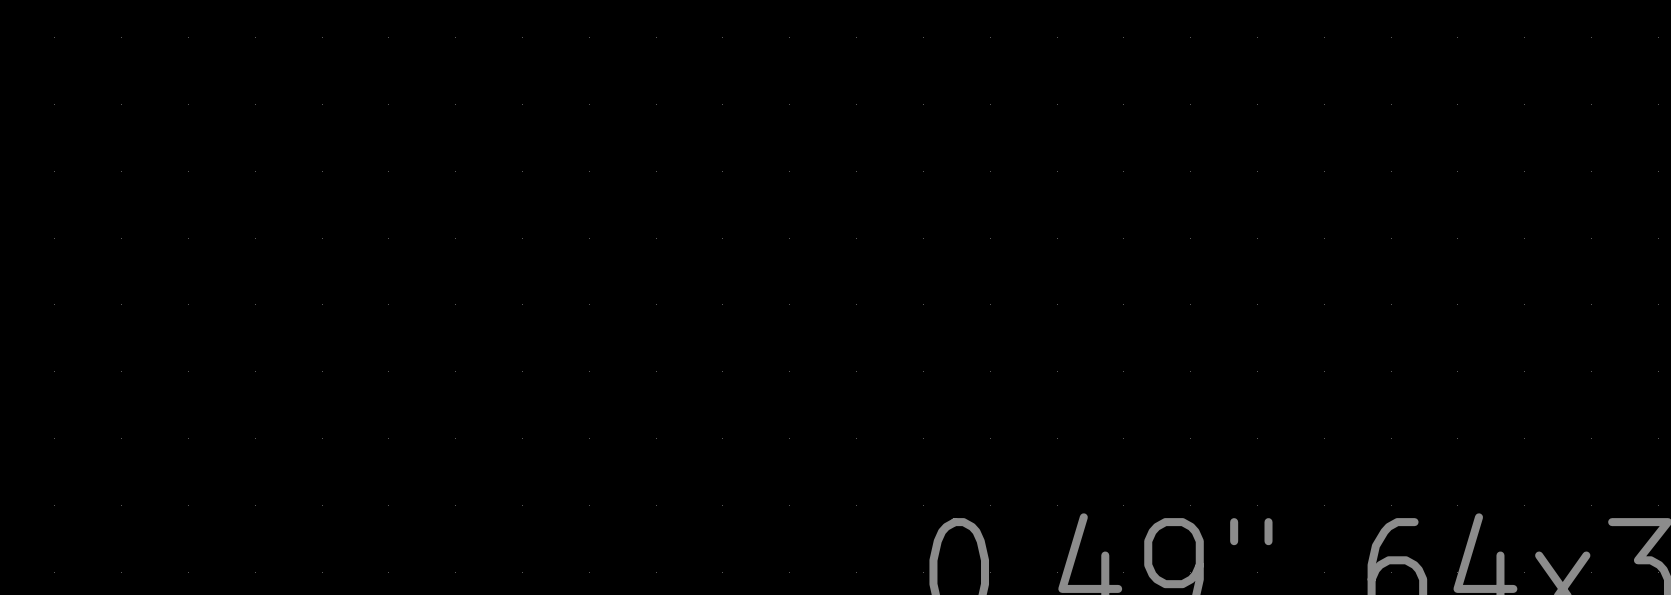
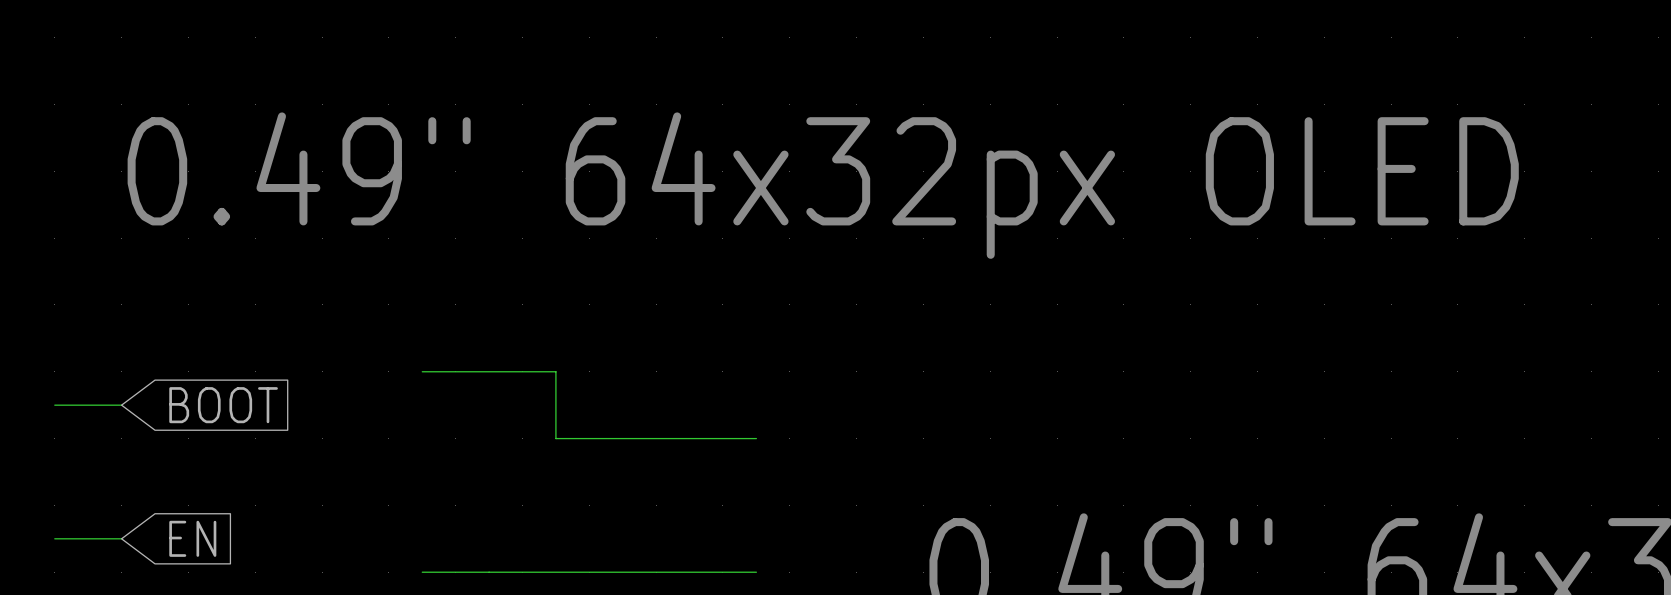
text: none -> 0.49" 64x32px OLED (823, 185)
wire: none -> (422, 371) (555, 371) (555, 438) (756, 438)
wire: none -> (54, 405) (121, 405)
global label: none -> BOOT (223, 405)
wire: none -> (54, 538) (121, 538)
global label: none -> EN (192, 538)
wire: none -> (422, 572) (756, 572)

